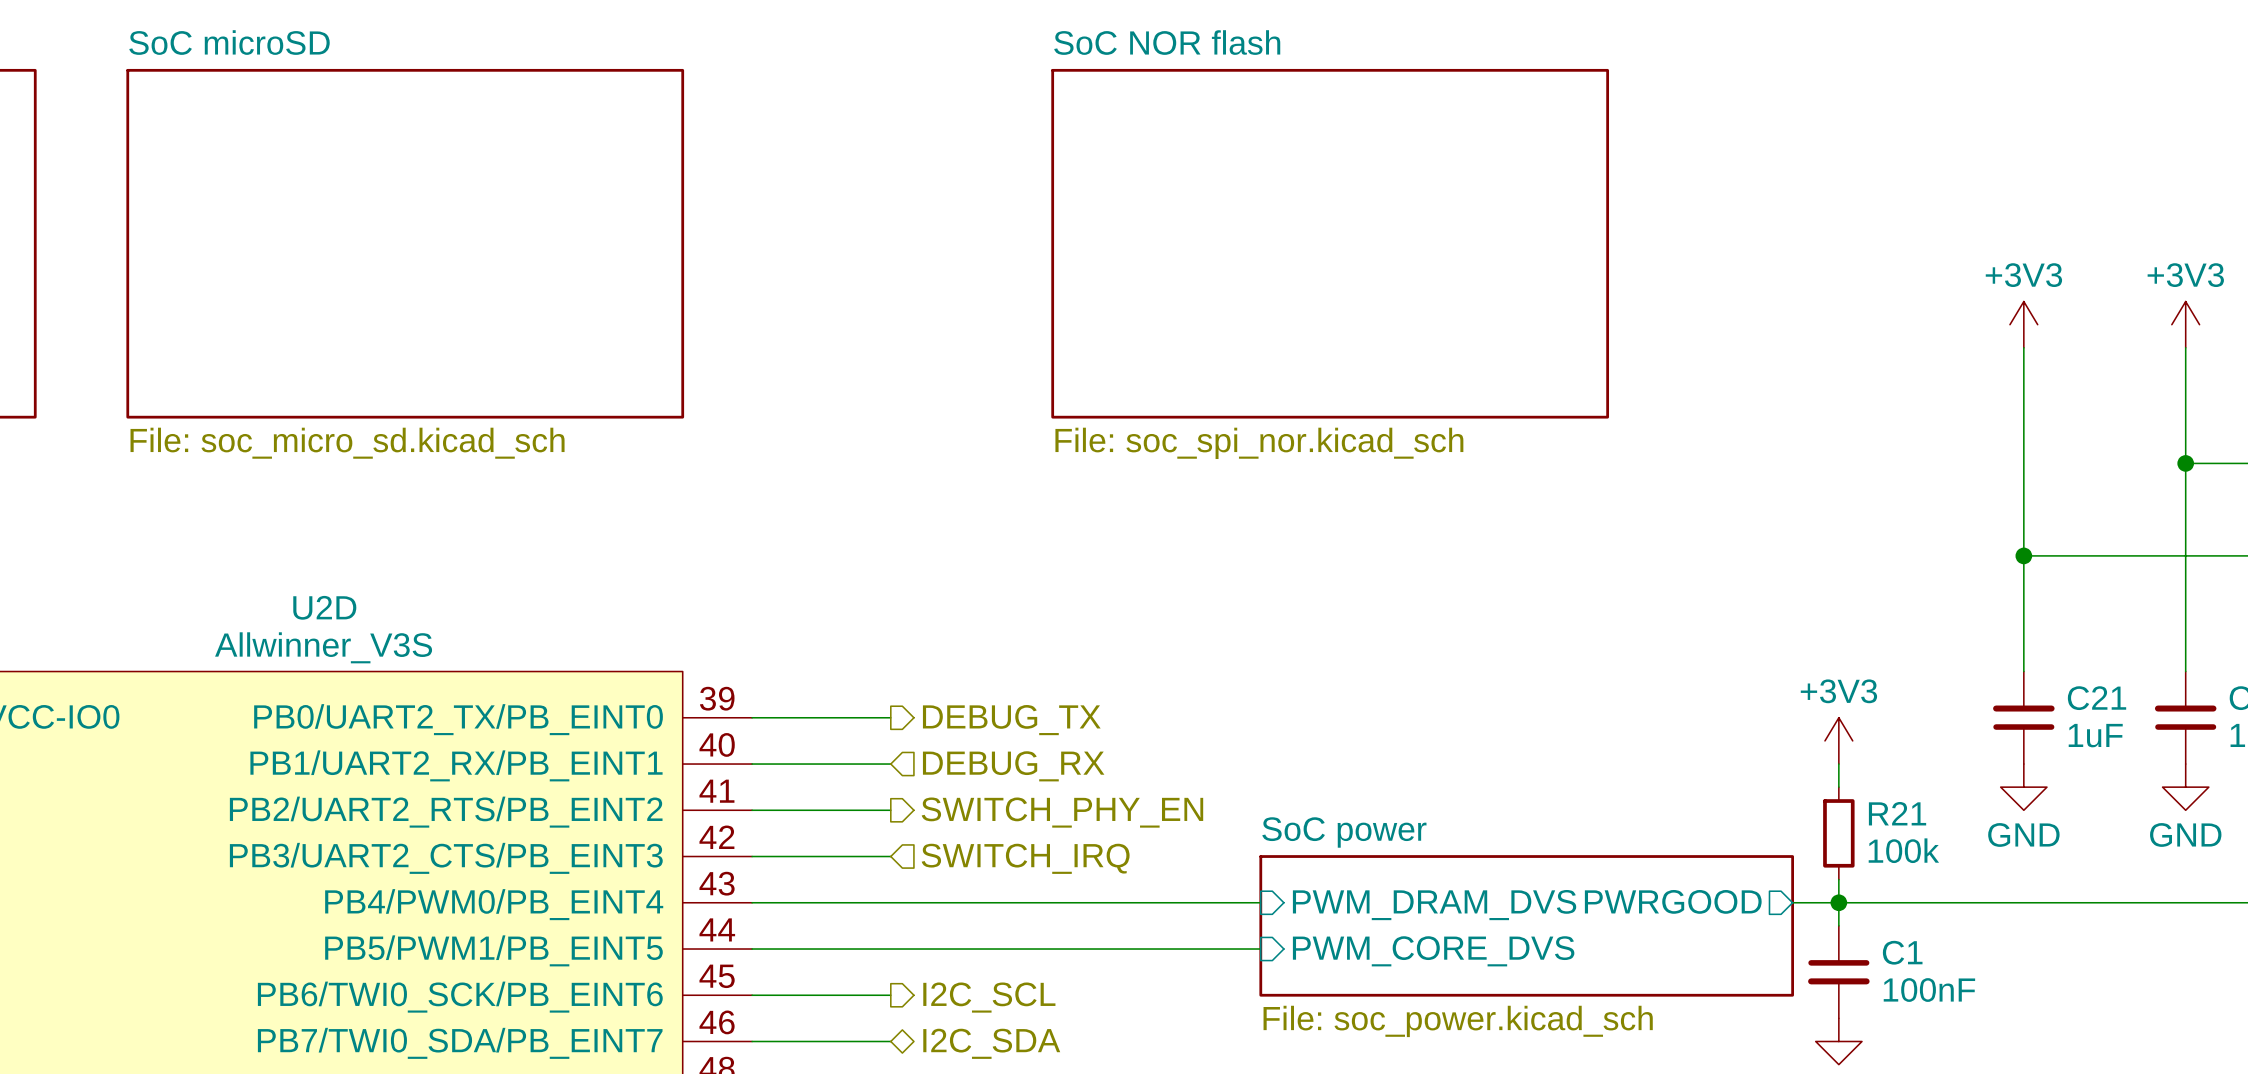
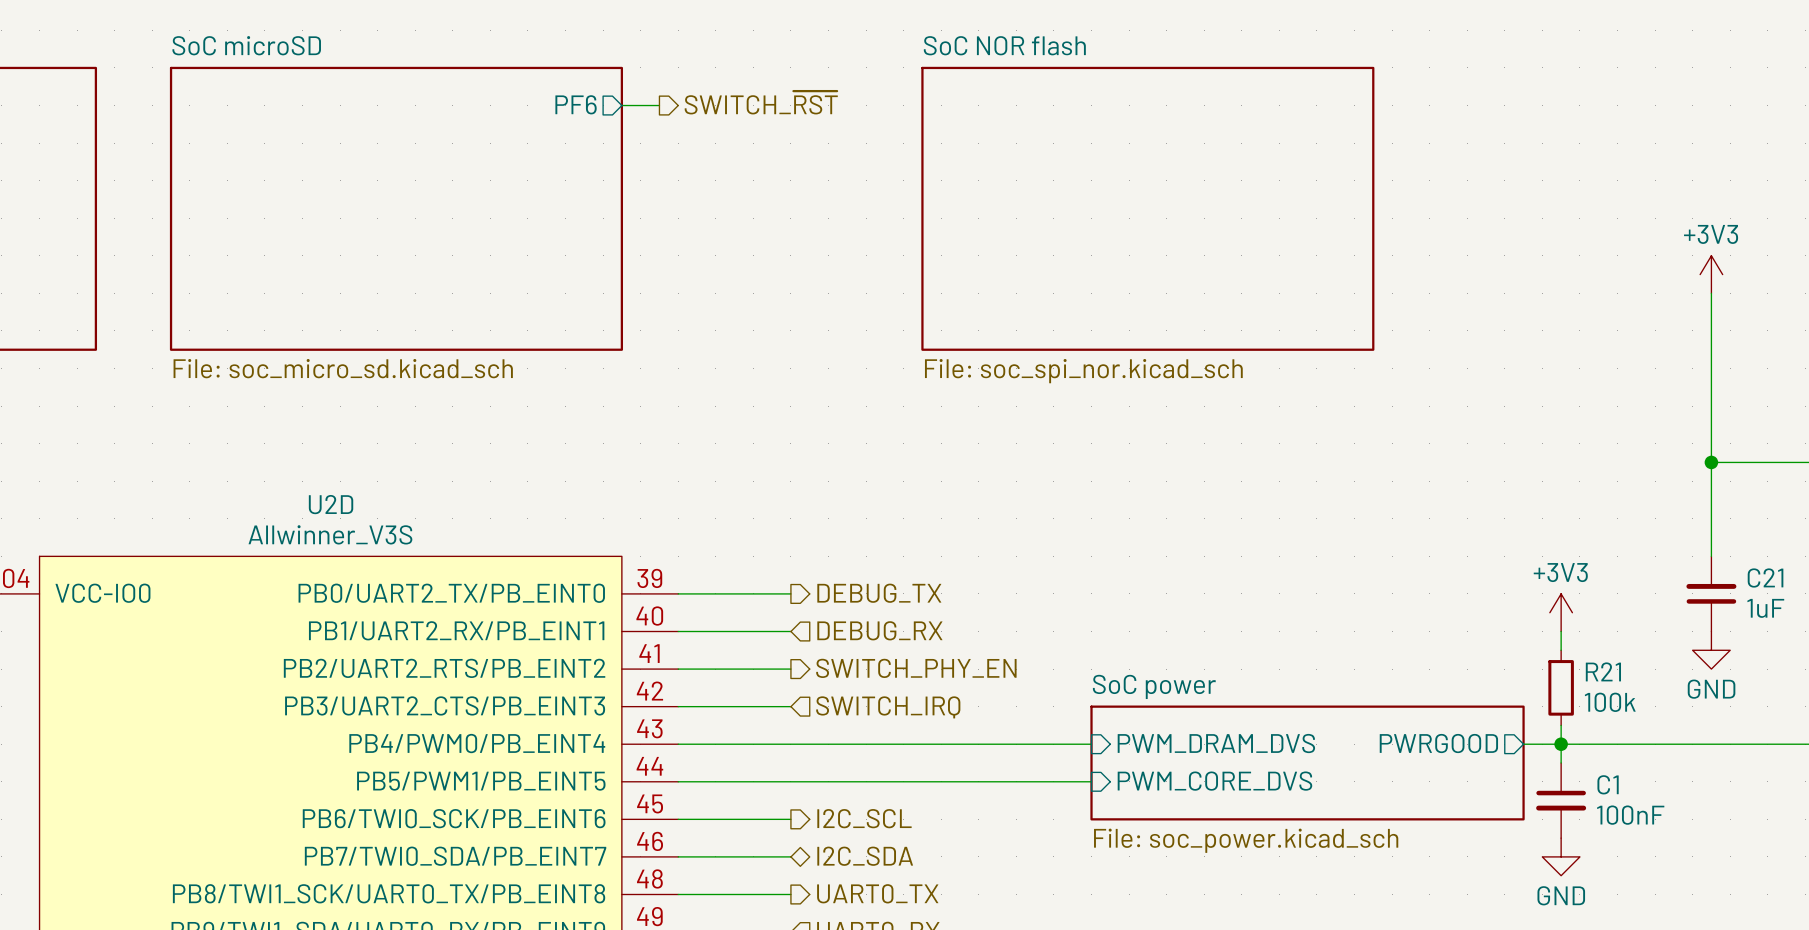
sheet pin: none -> PF6 (576, 104)
wire: none -> (621, 105) (659, 105)
hierarchical label: none -> SWITCH_~{RST} (761, 102)

